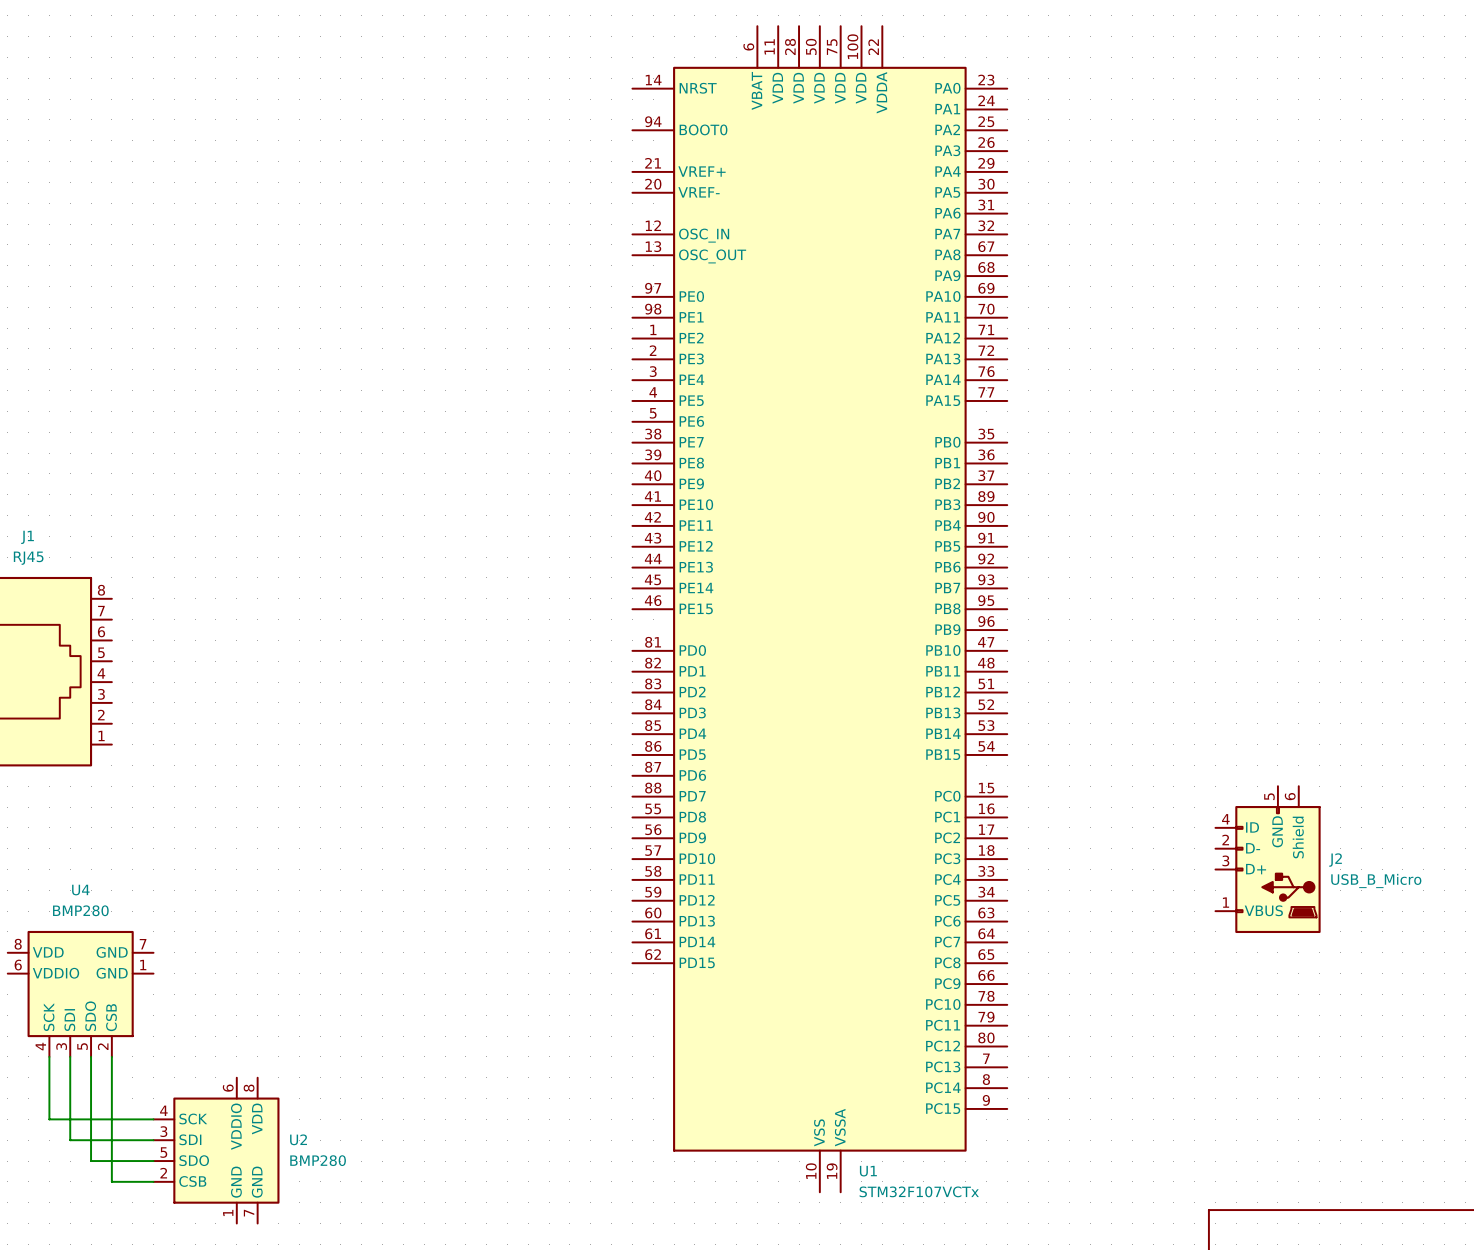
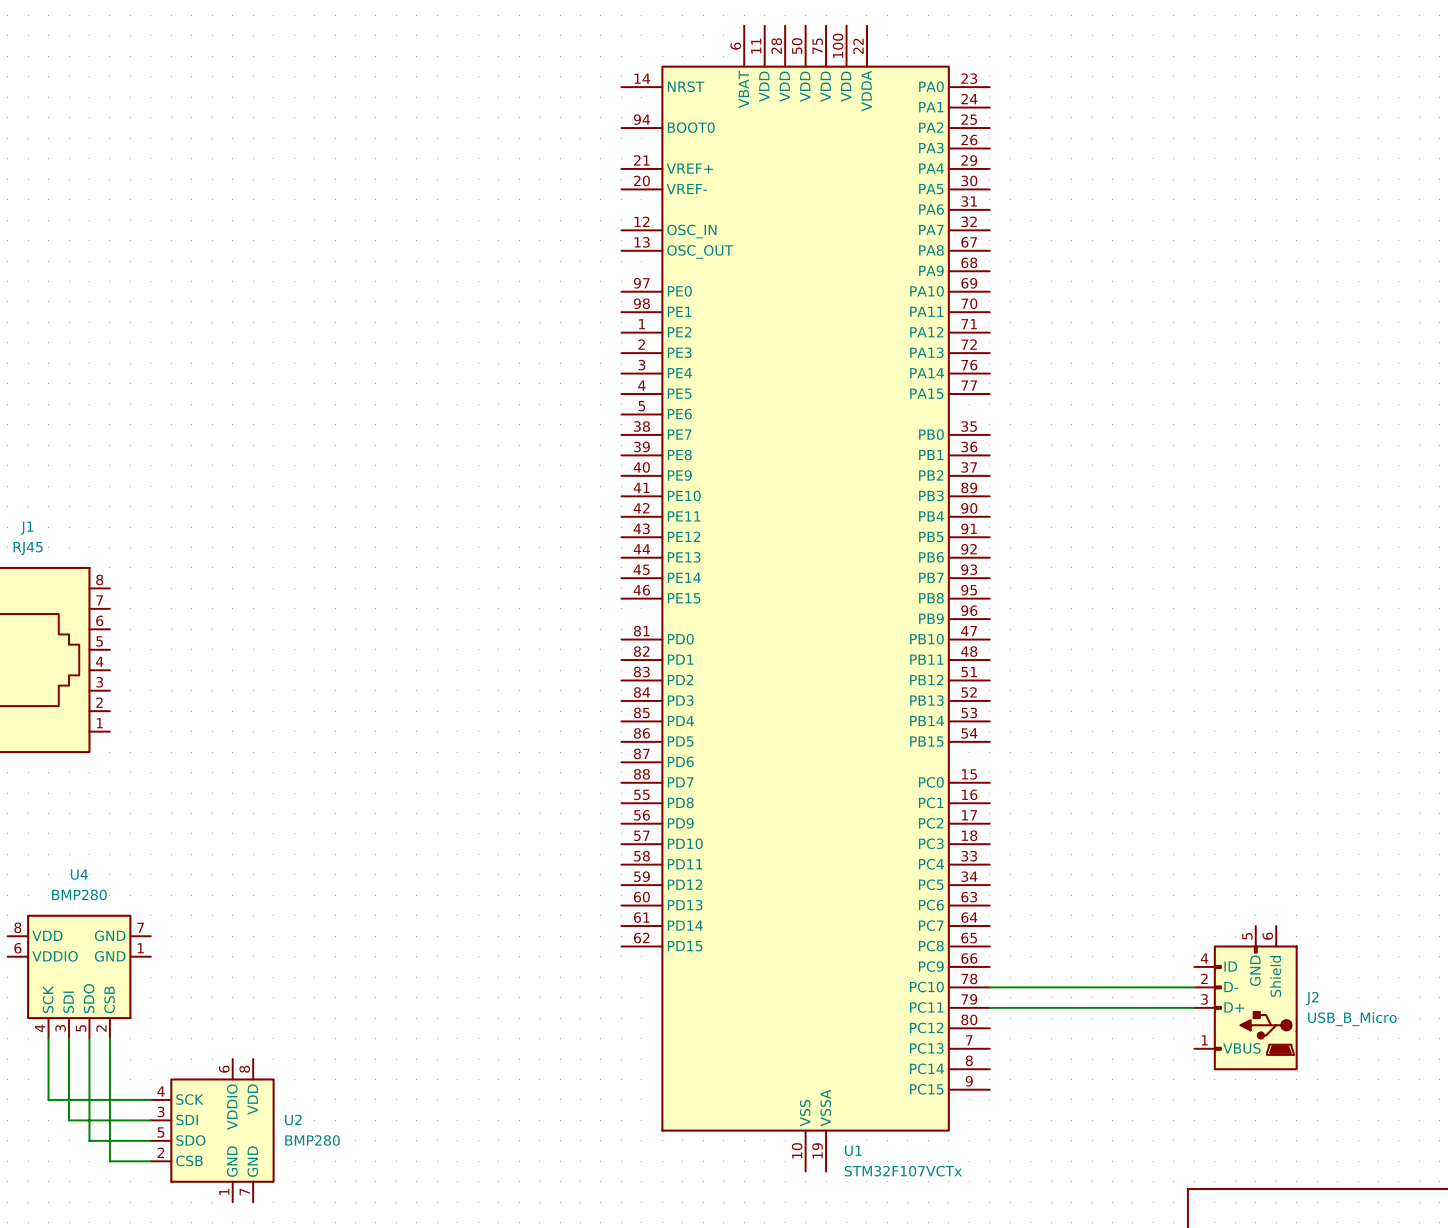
J2 position: (1268, 859) -> (1246, 998)
wire: none -> (989, 987) (1194, 987)
wire: none -> (989, 1007) (1194, 1007)

